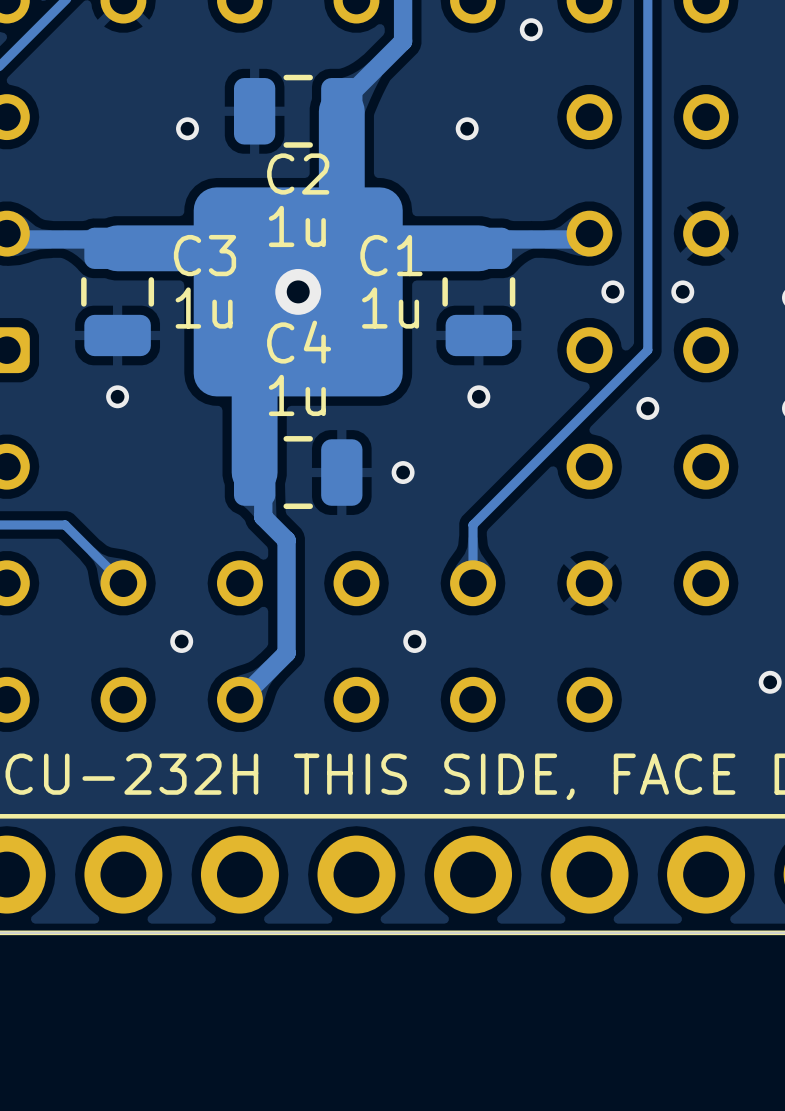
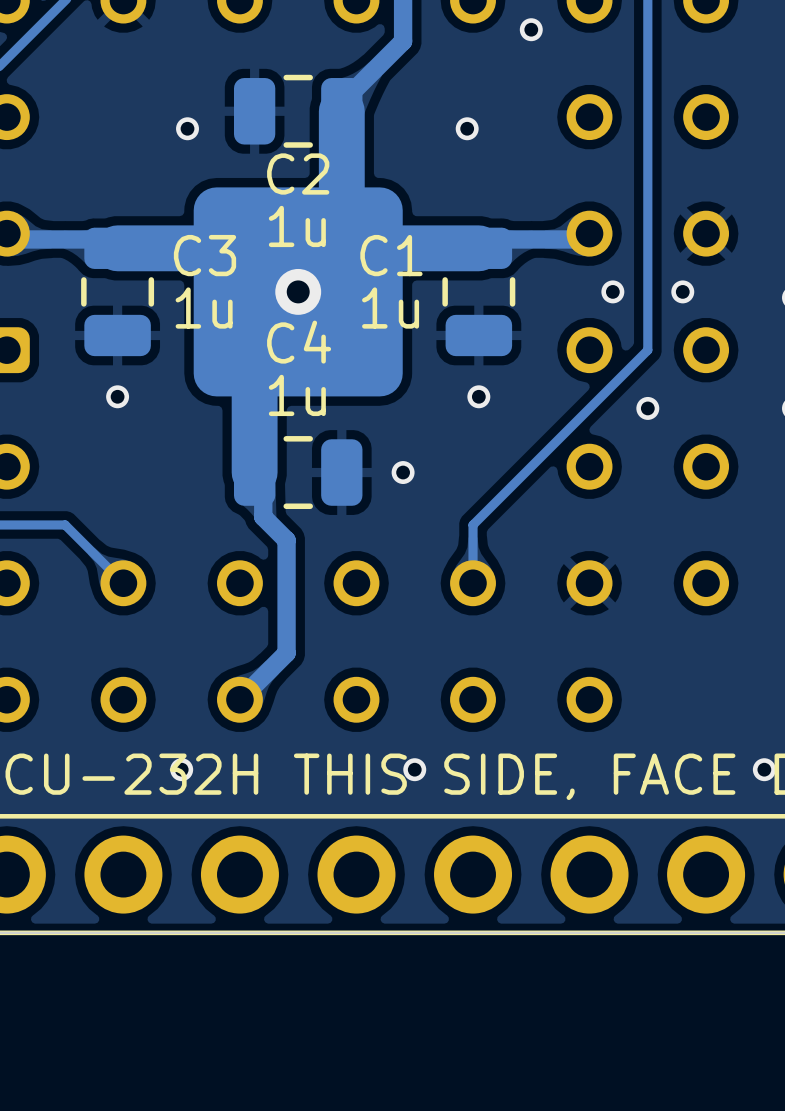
via position: (181, 641) -> (181, 769)
via position: (414, 641) -> (414, 769)
via position: (770, 682) -> (764, 769)

